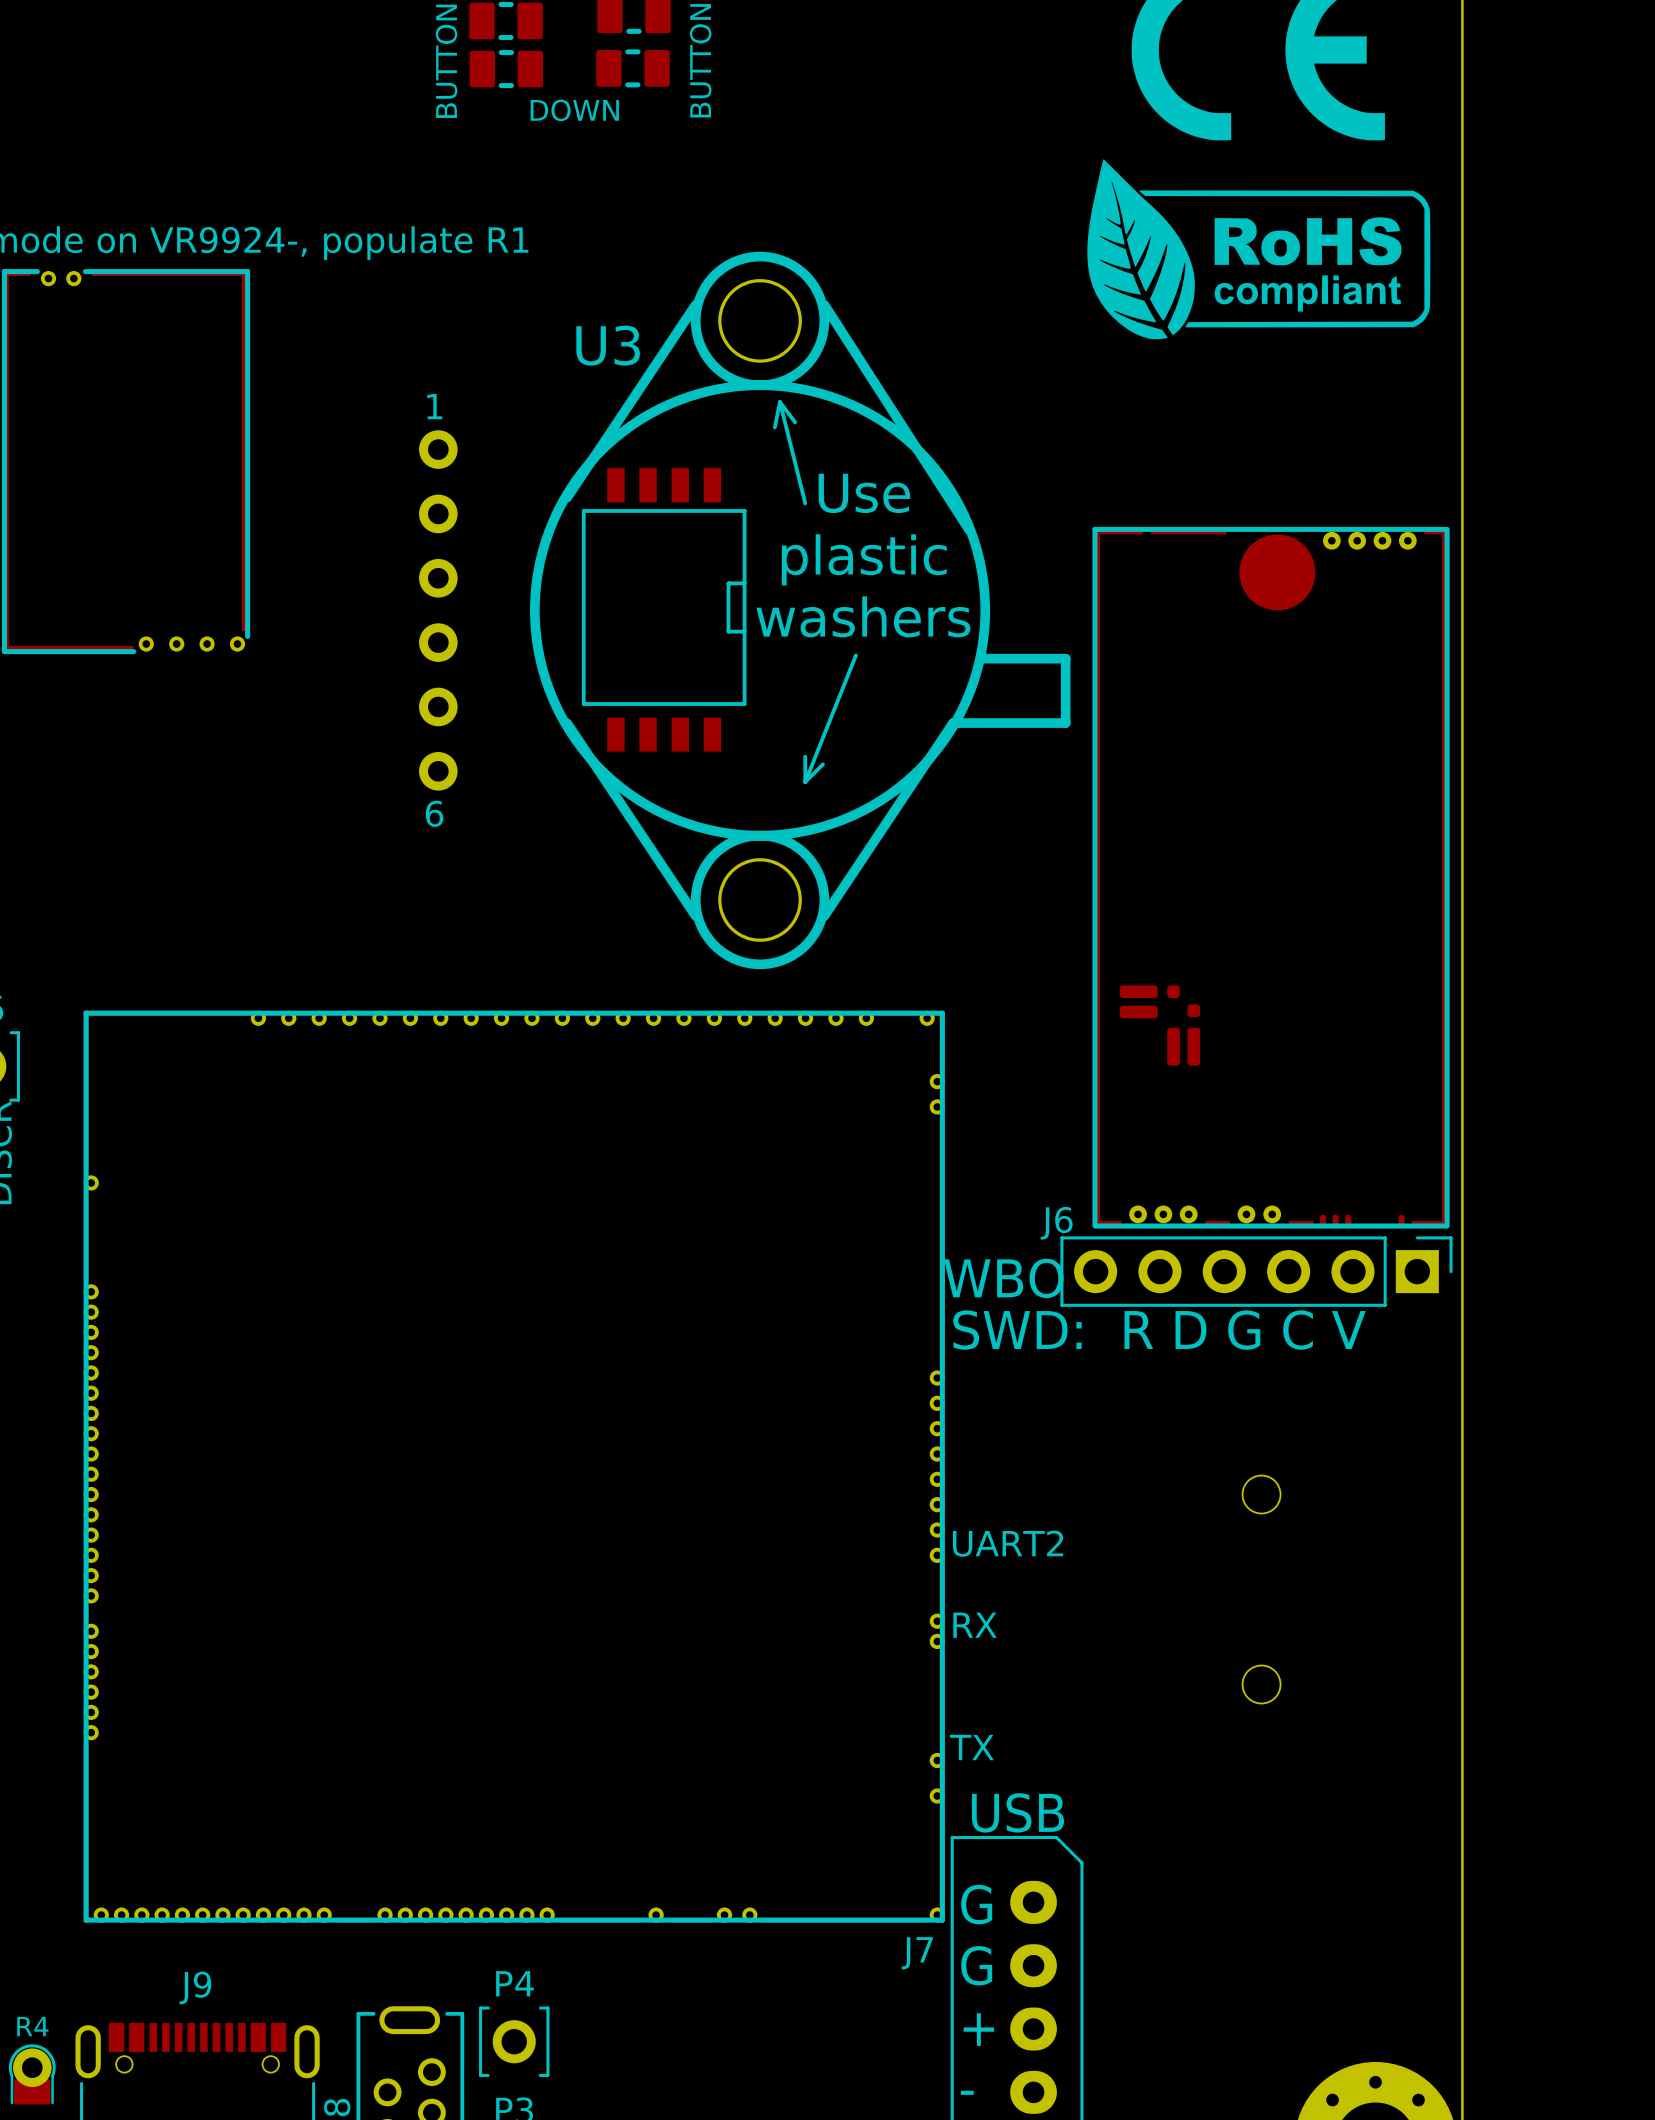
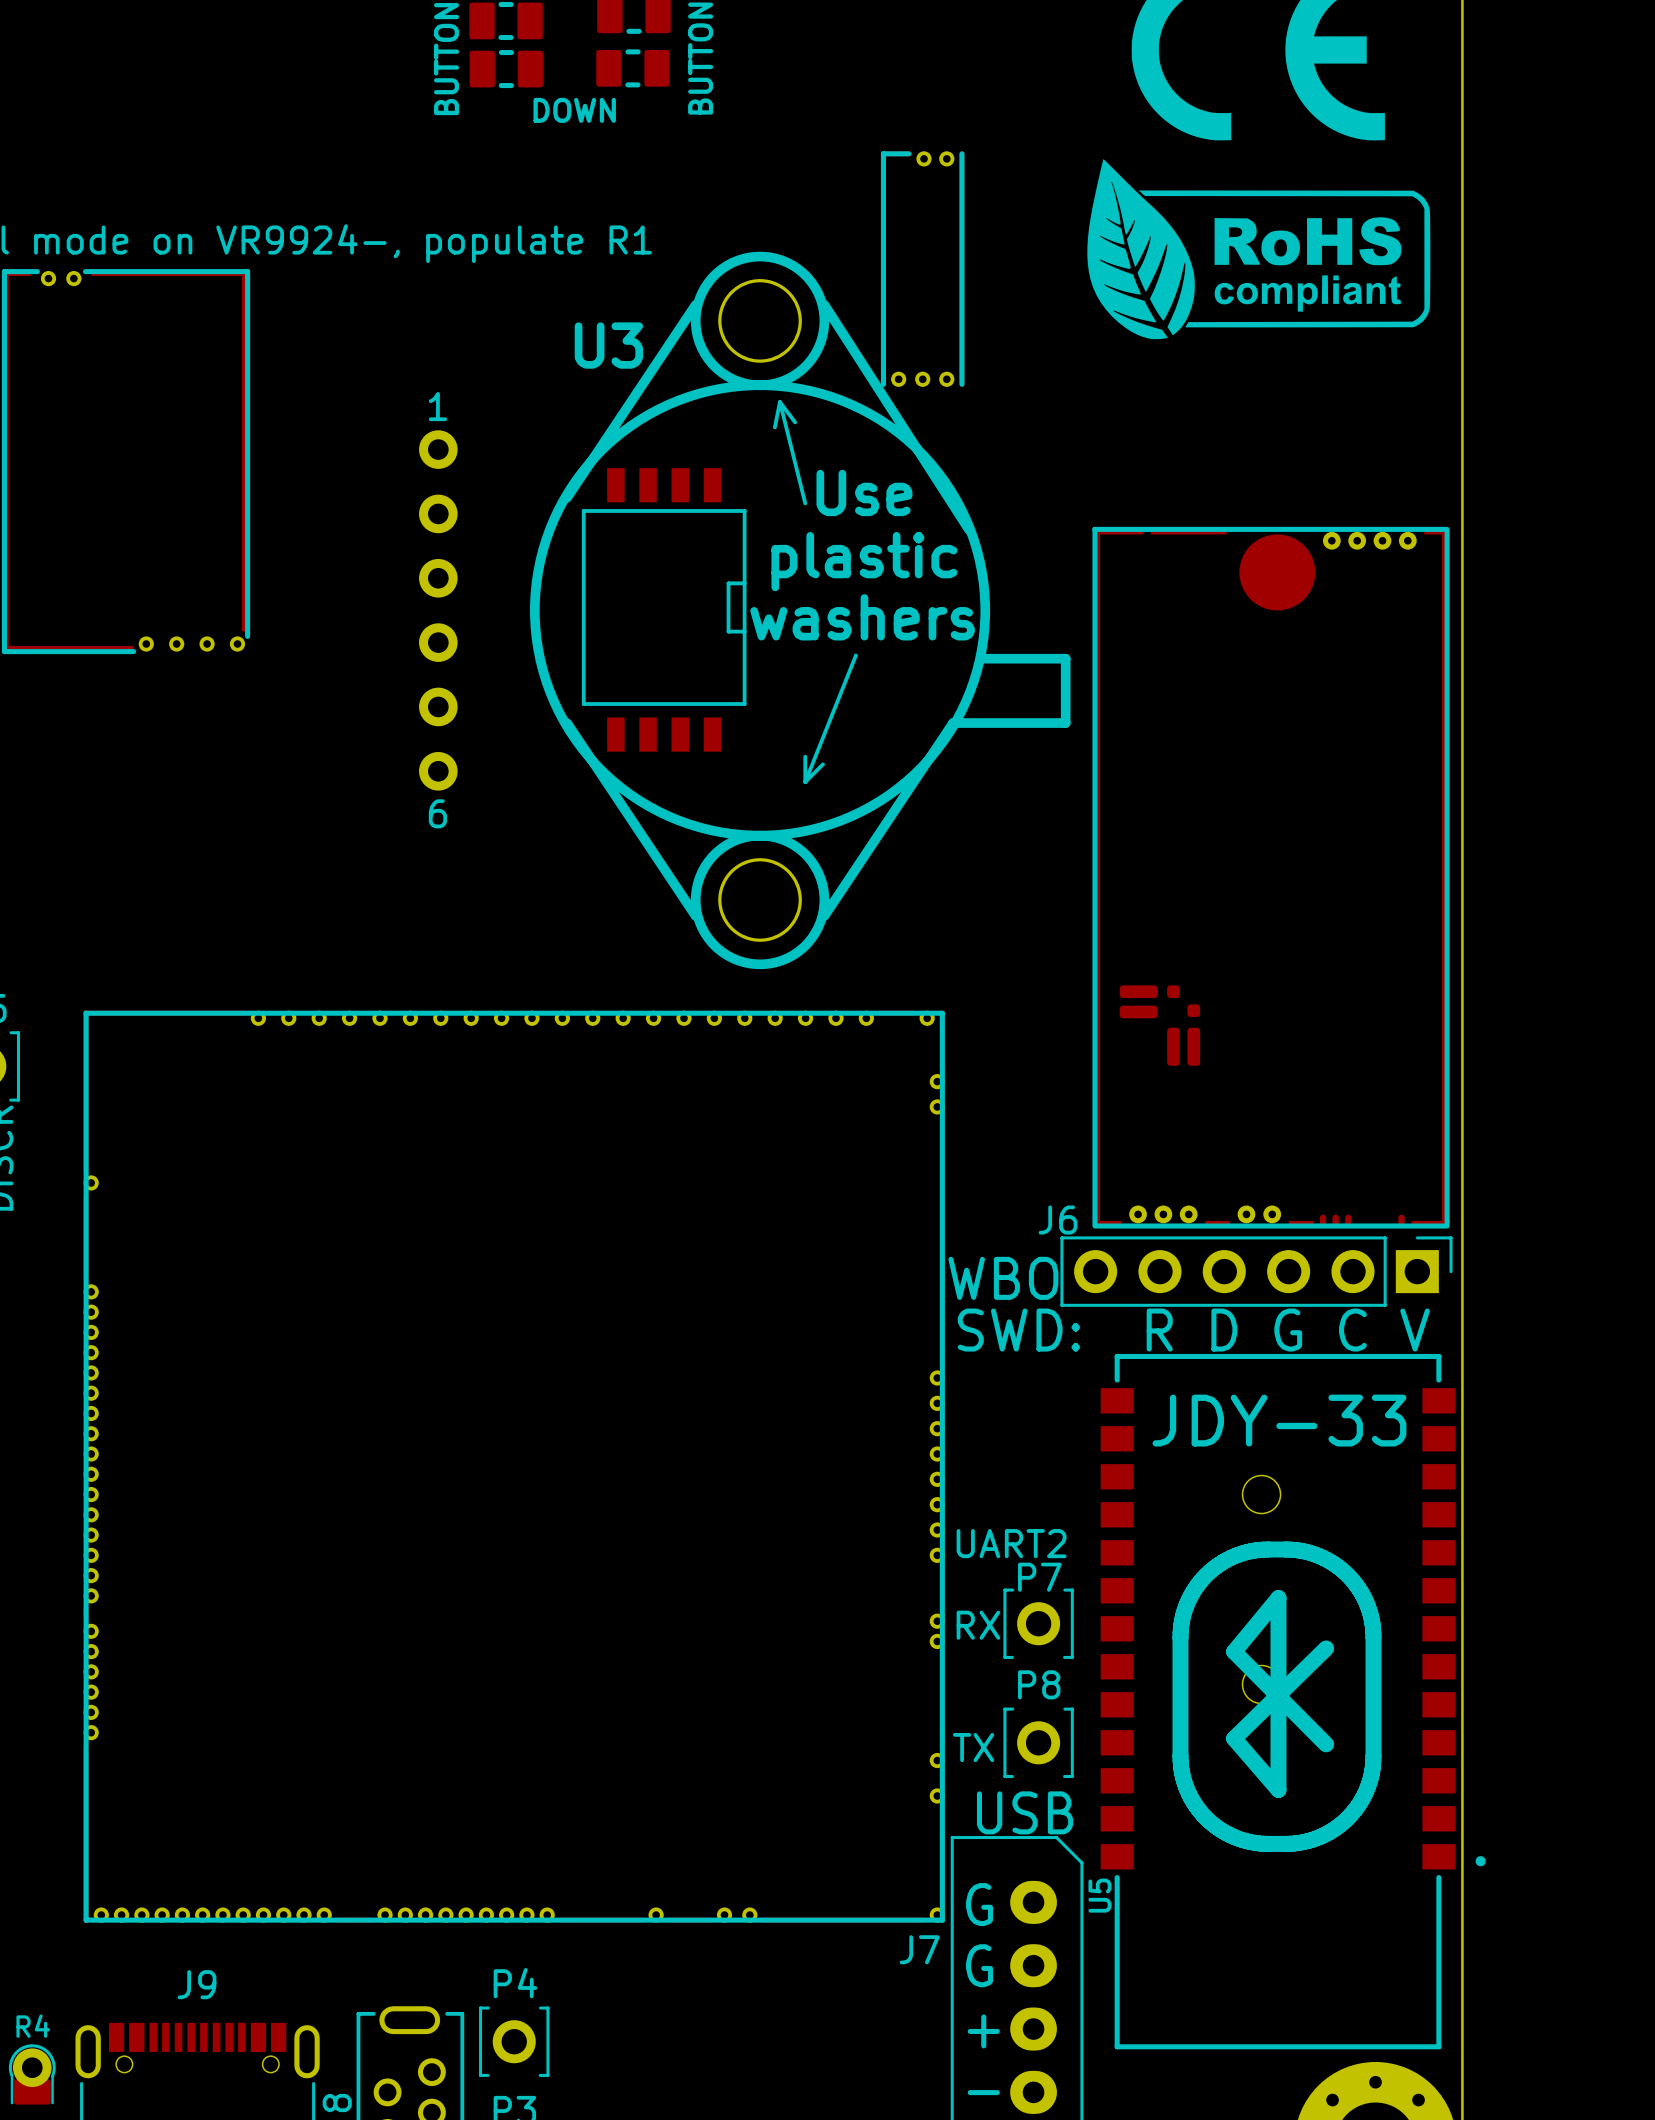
part: none -> (922, 269)
P7: none -> (1038, 1623)
U5: none -> (1293, 1701)
P8: none -> (1038, 1742)

